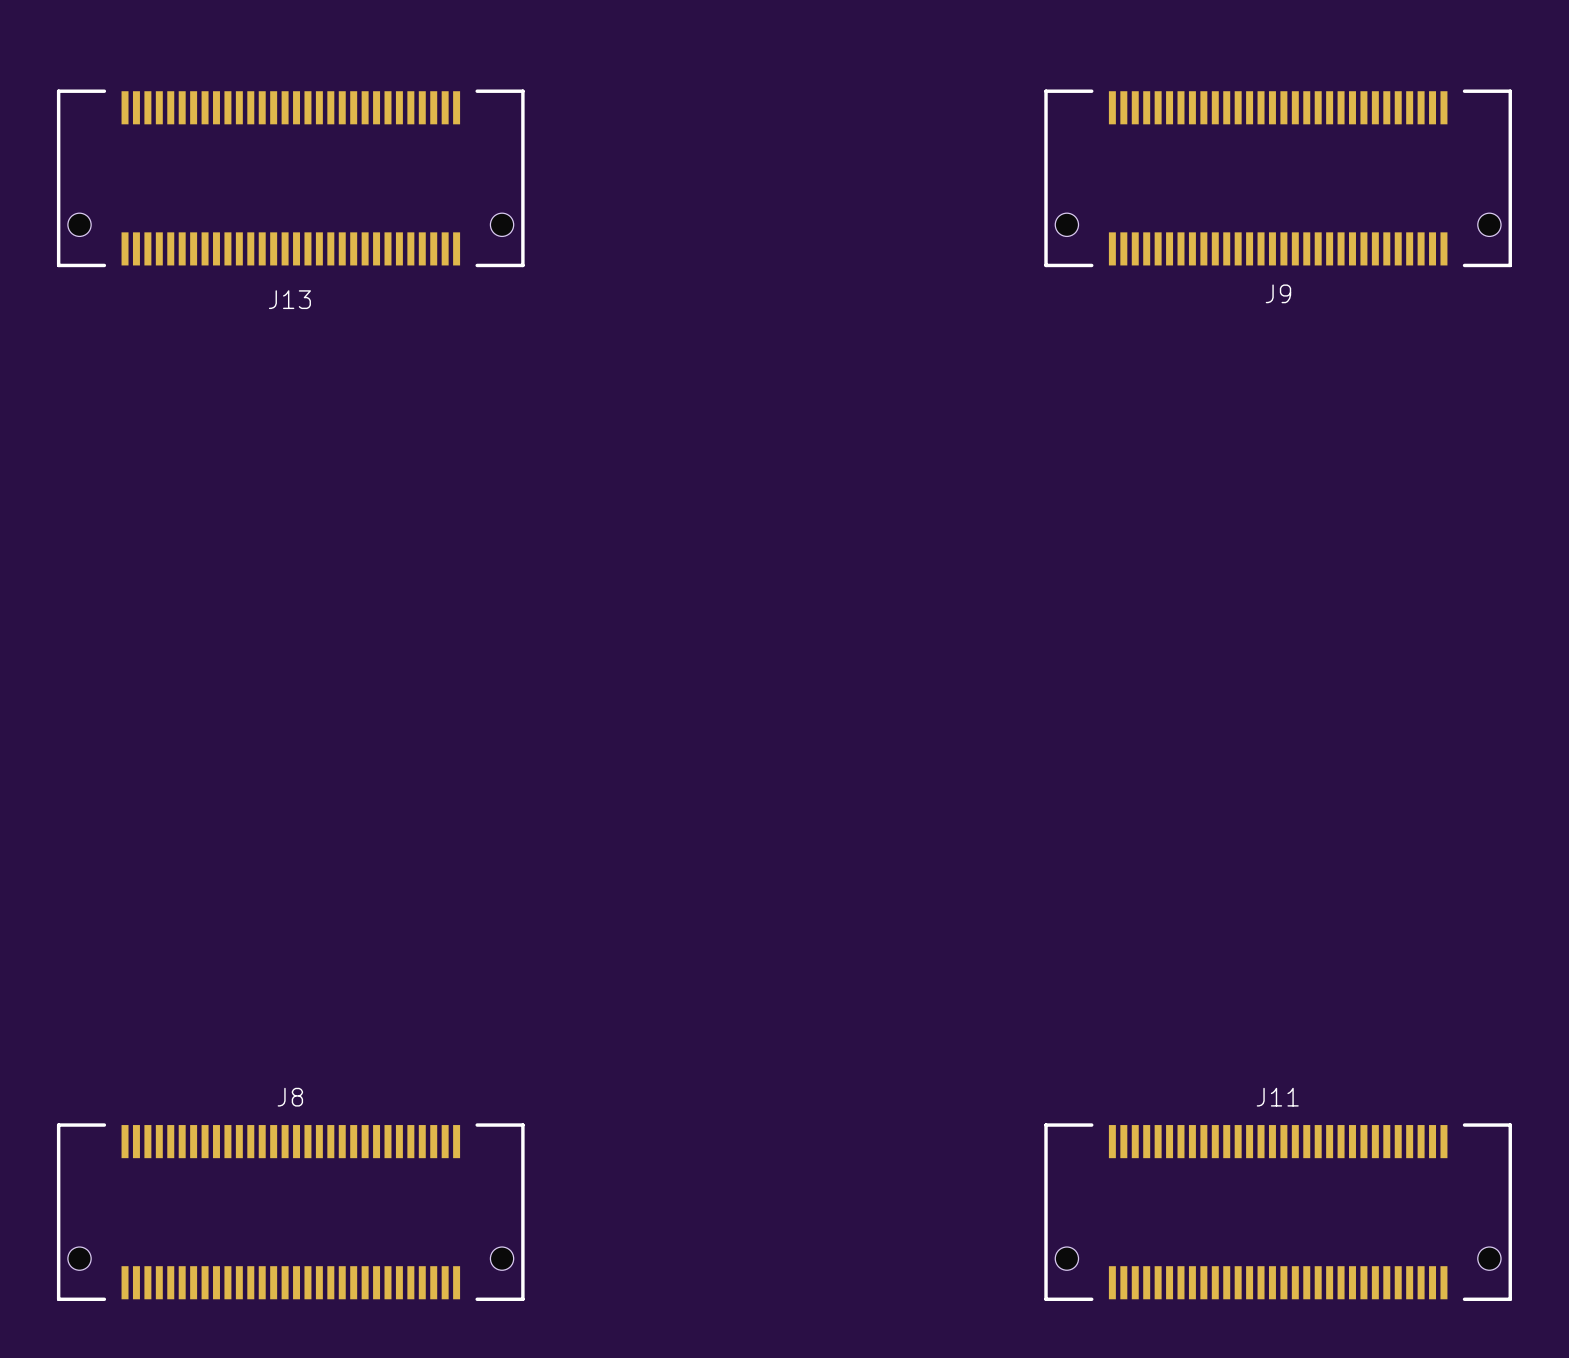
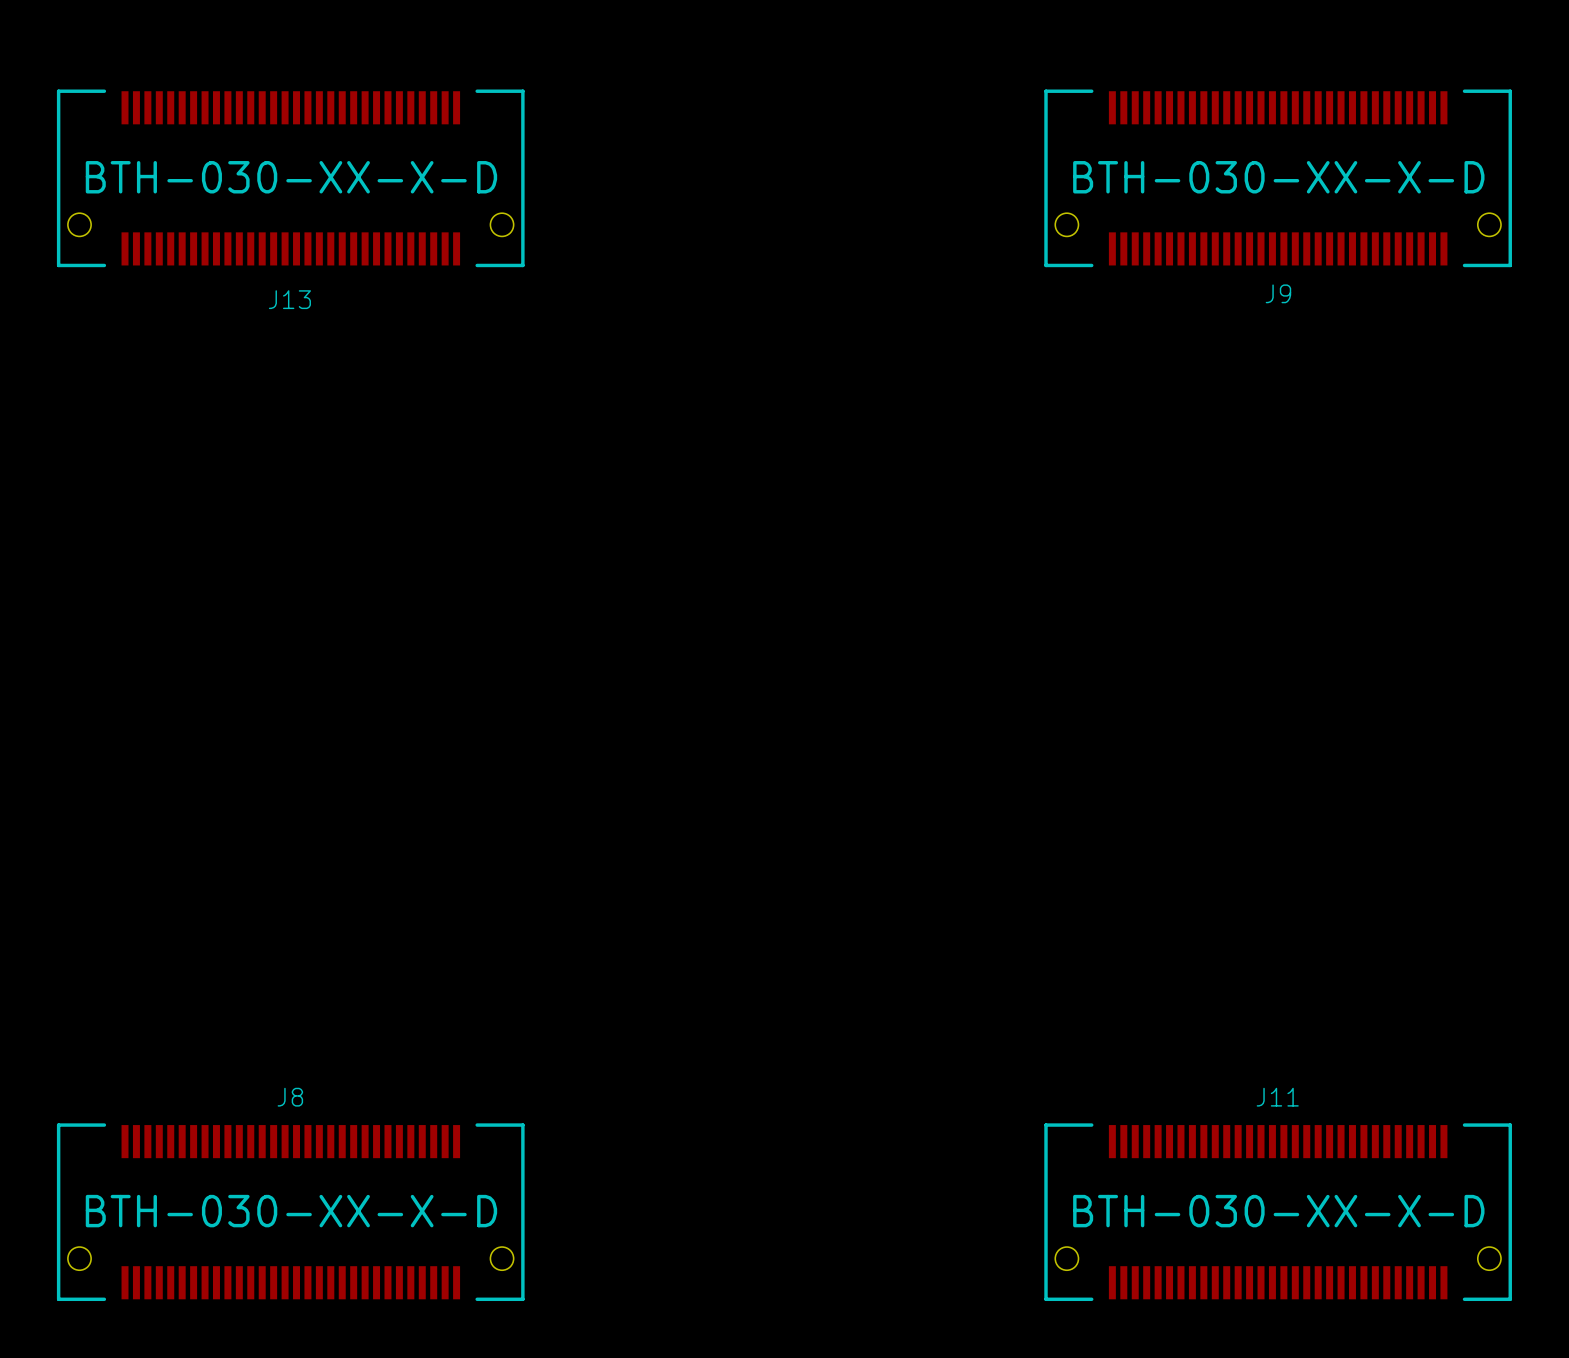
J13 value: none -> BTH-030-XX-X-D (291, 177)
J9 value: none -> BTH-030-XX-X-D (1278, 177)
J8 value: none -> BTH-030-XX-X-D (291, 1211)
J11 value: none -> BTH-030-XX-X-D (1278, 1211)

